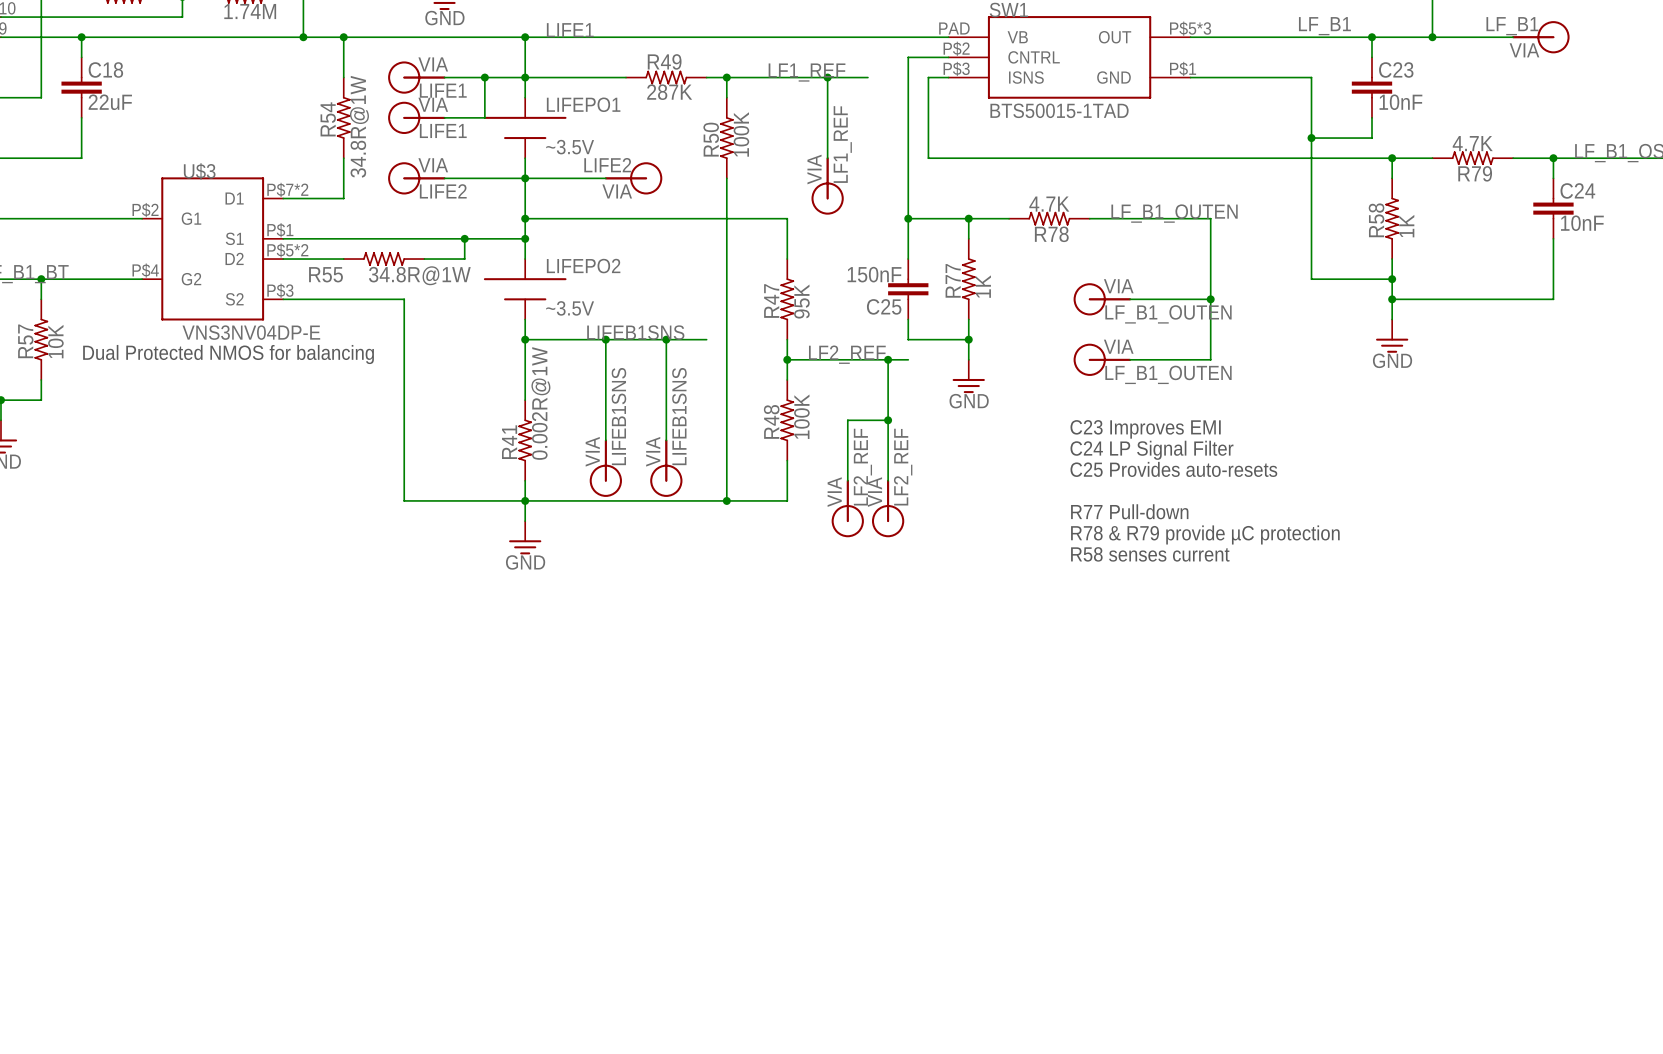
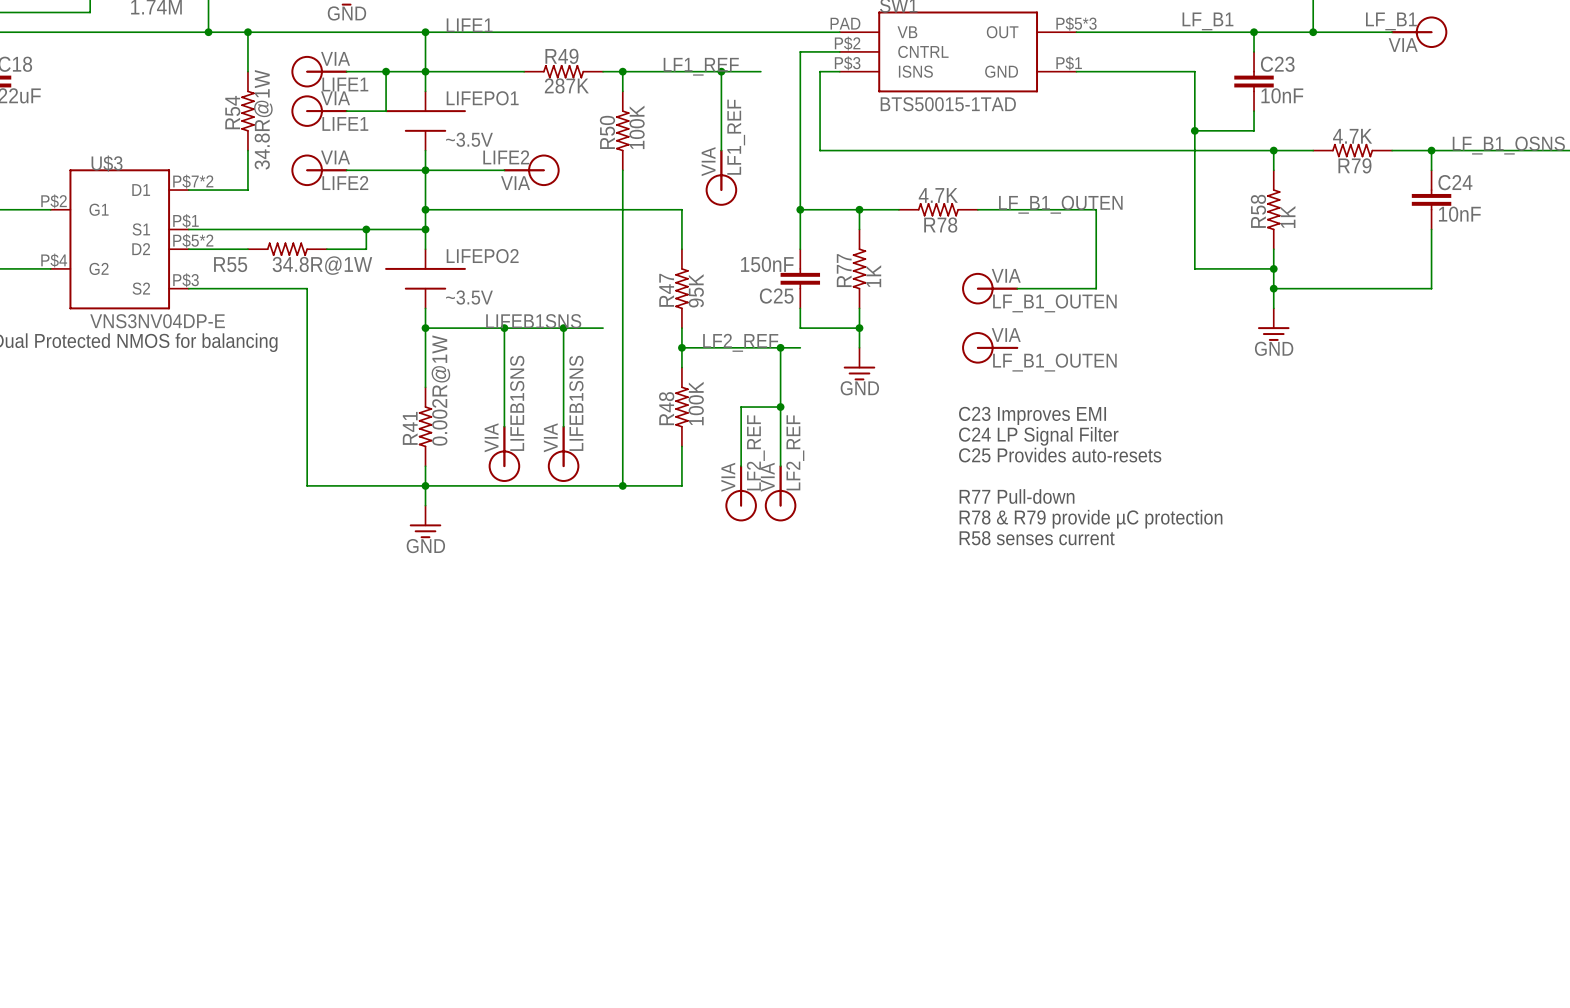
wire: (1210, 299) (1210, 359) (1130, 359) -> none
junction: (1210, 299) -> none

